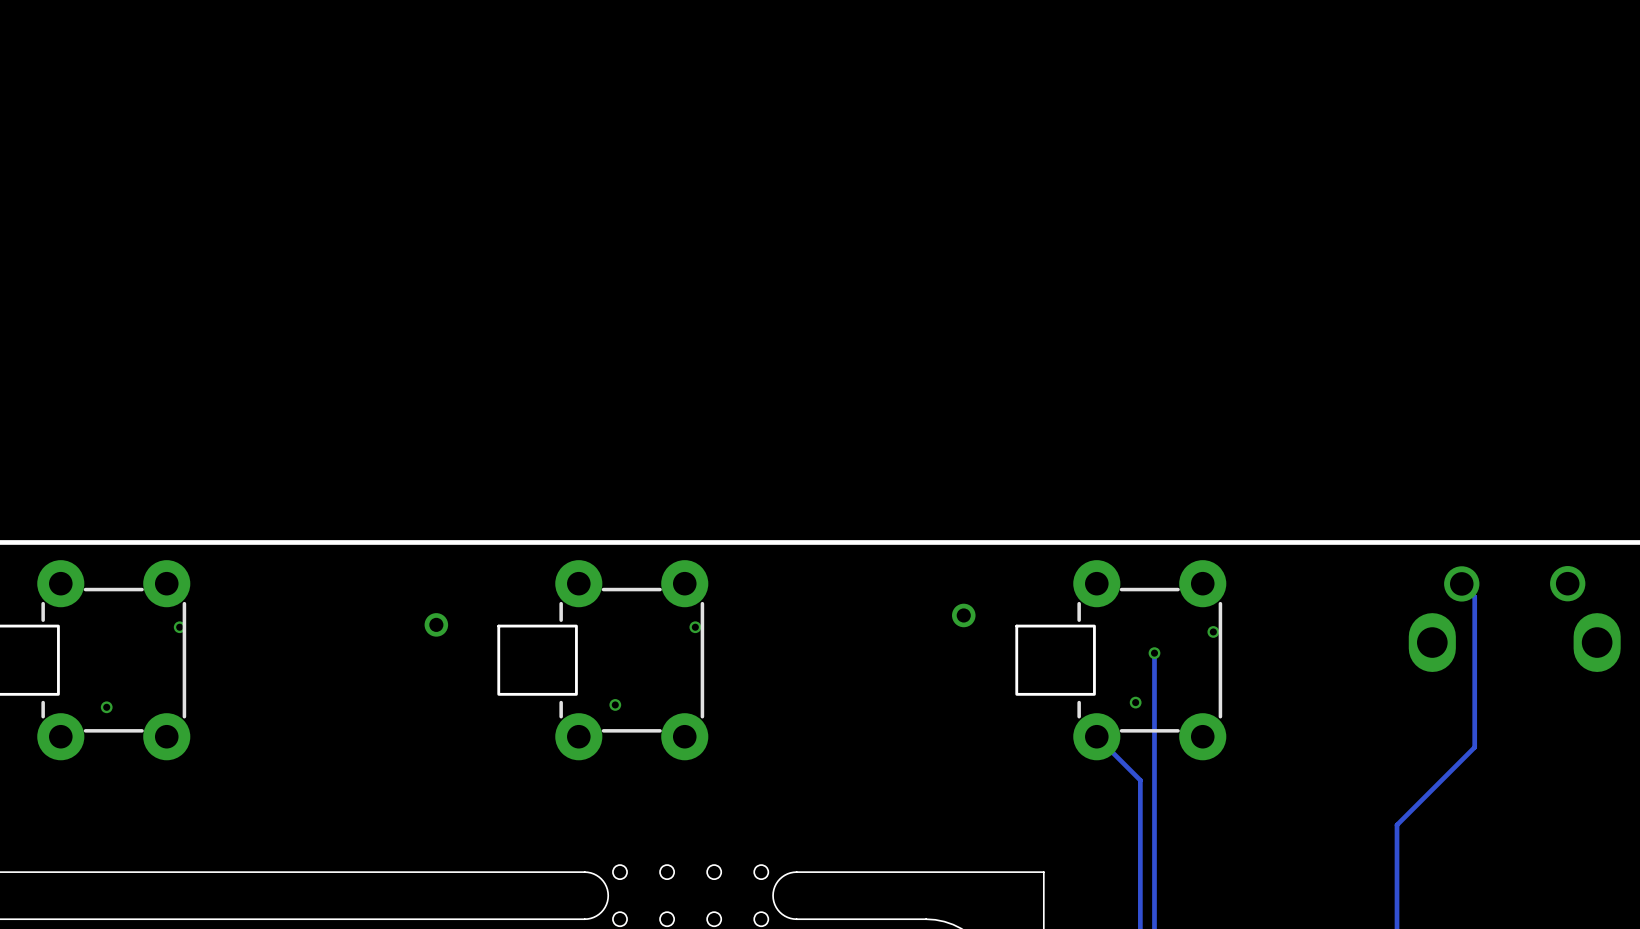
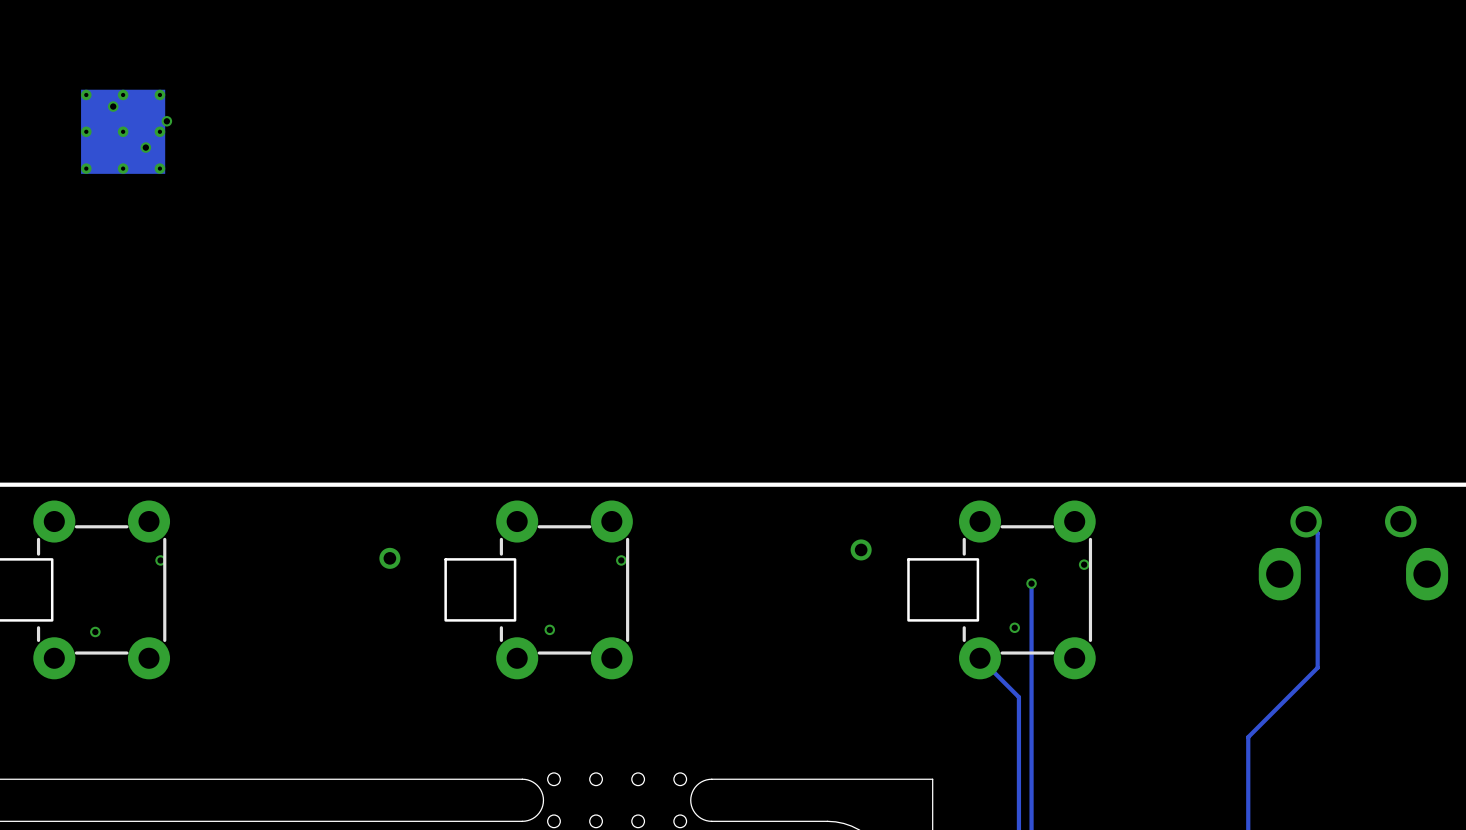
via: none -> (113, 106)
via: none -> (166, 121)
part: none -> (123, 131)
via: none -> (145, 147)

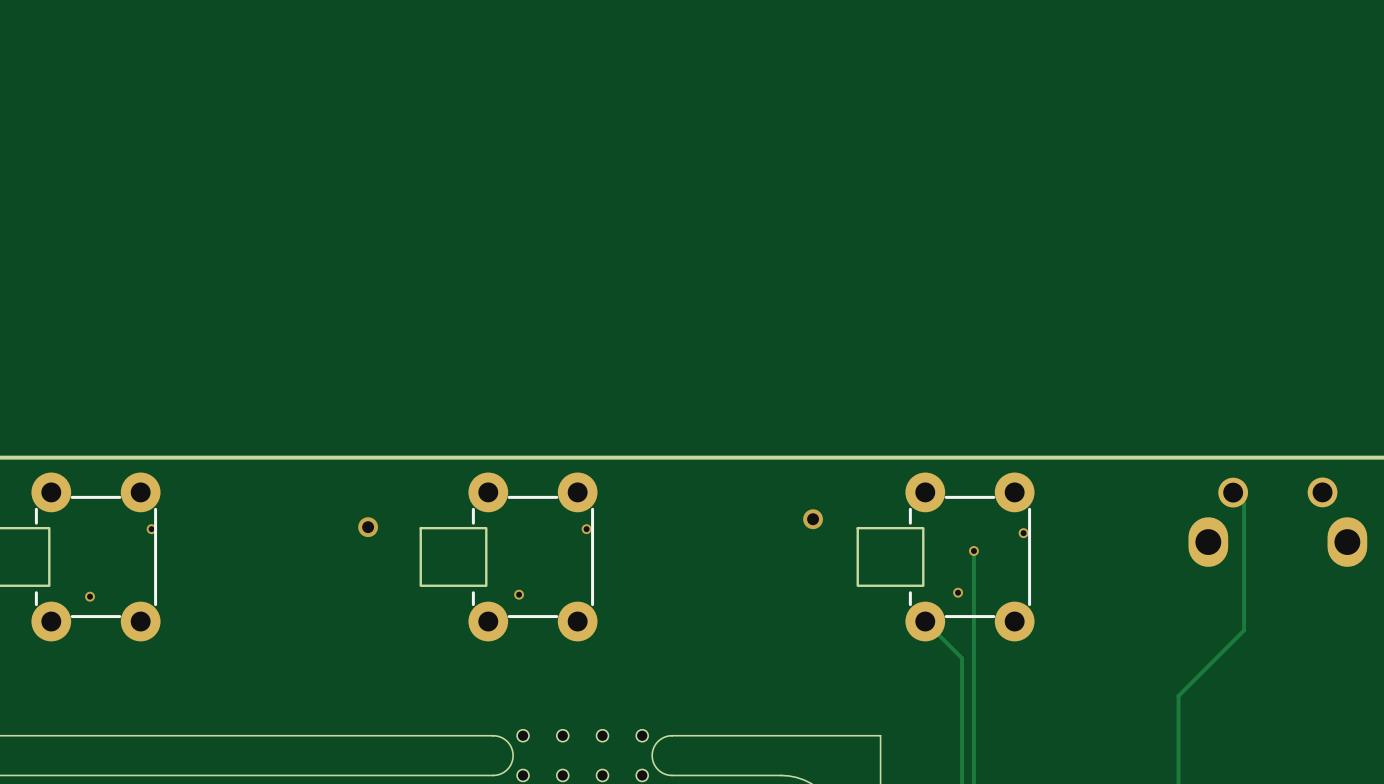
via: (113, 106) -> none
via: (166, 121) -> none
part: (123, 131) -> none
via: (145, 147) -> none

